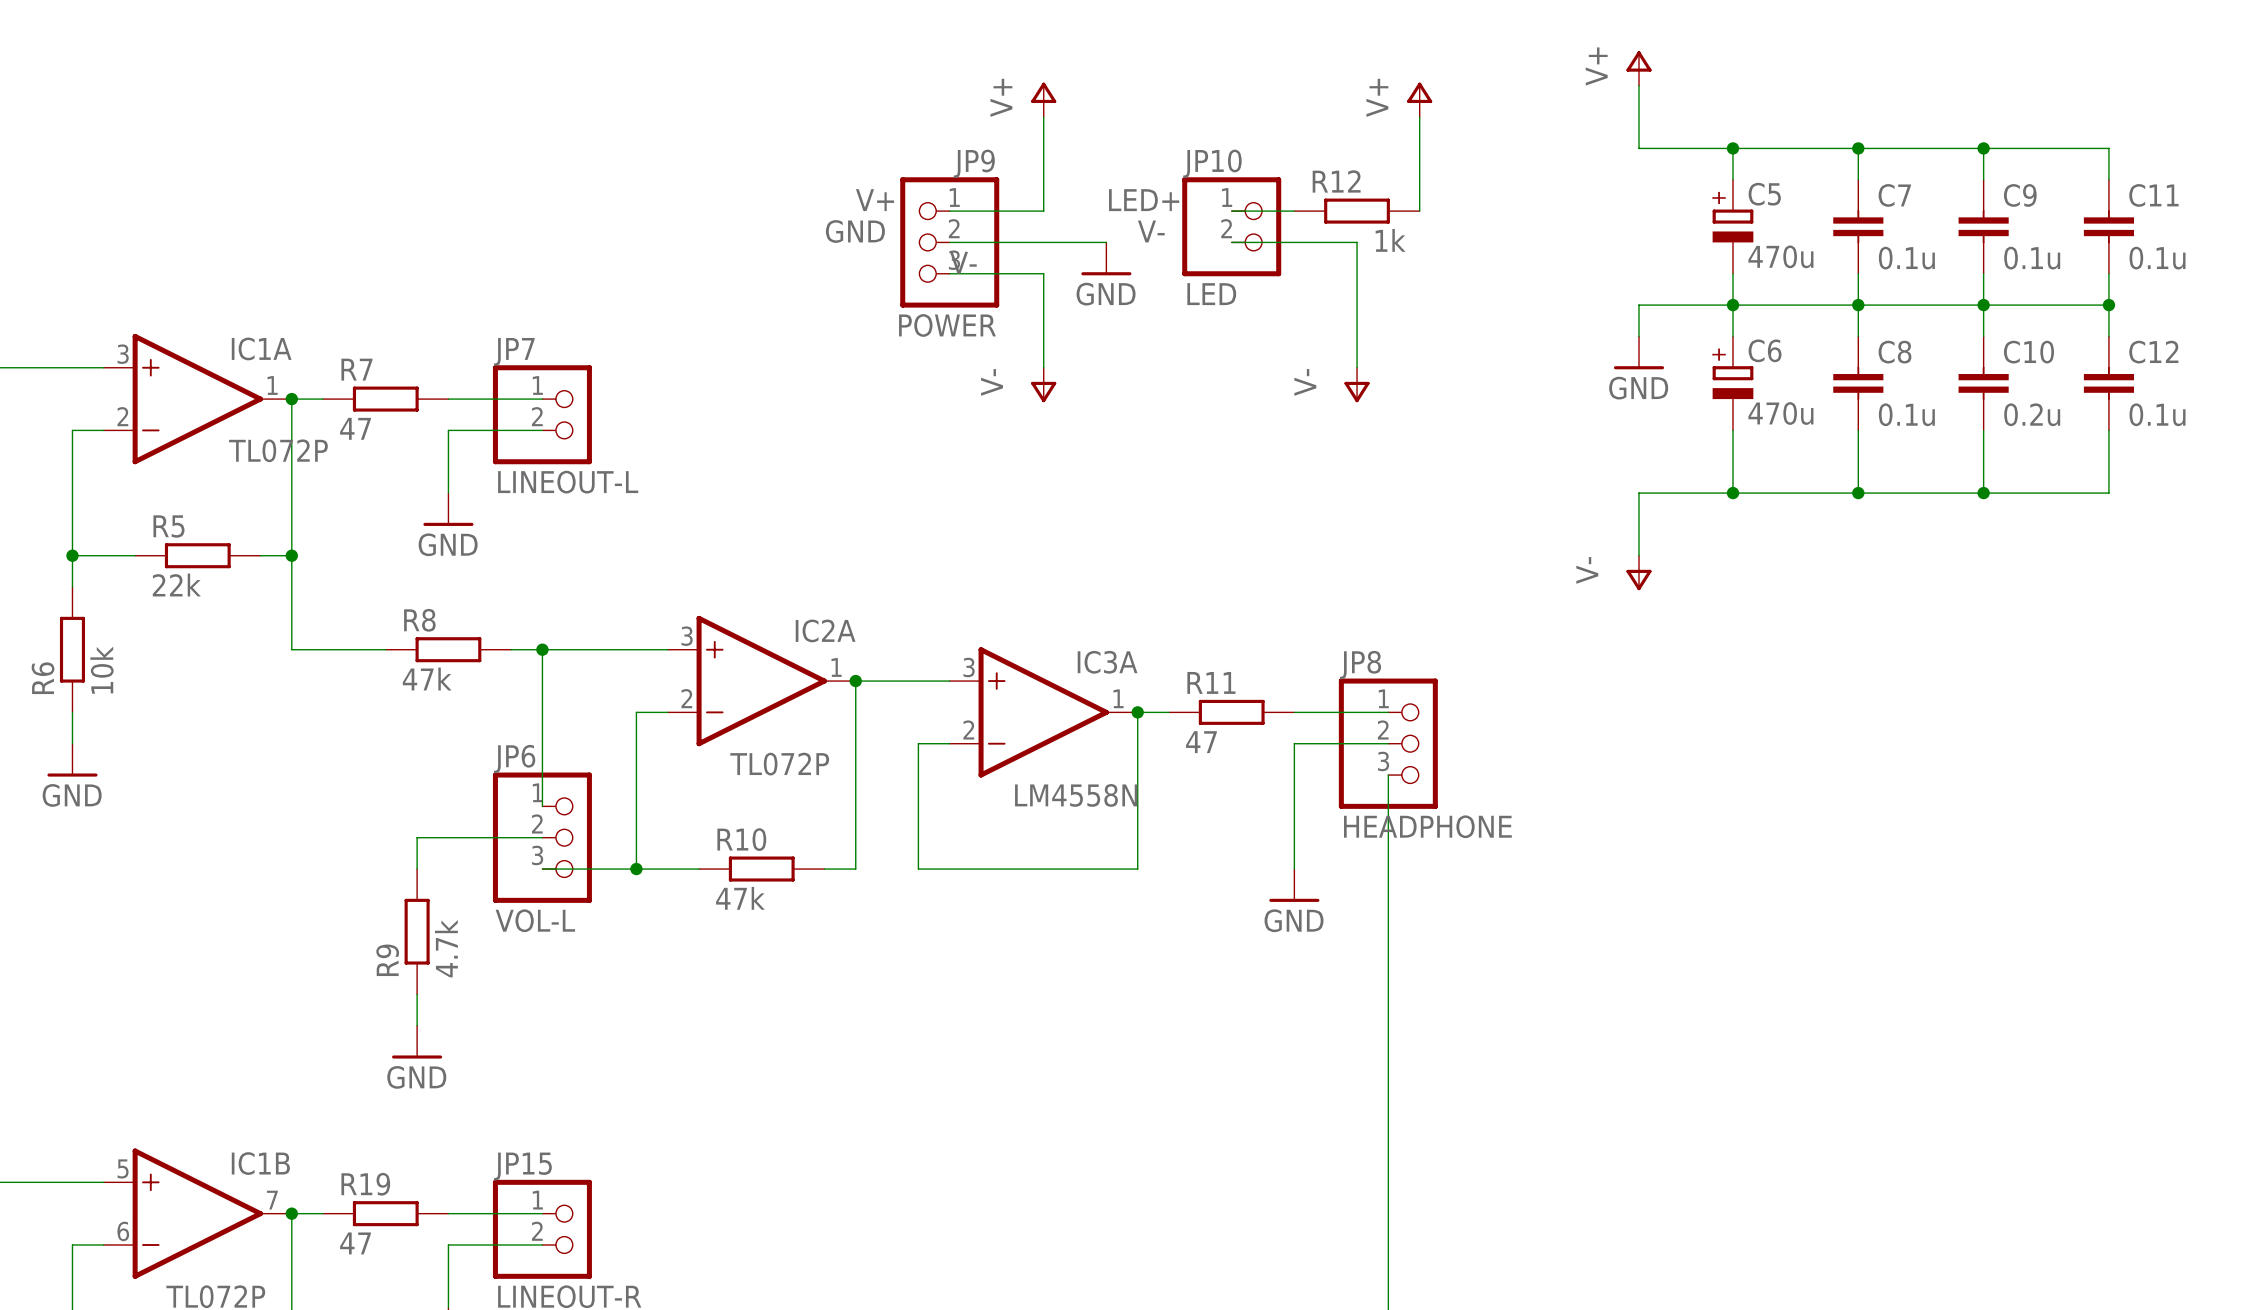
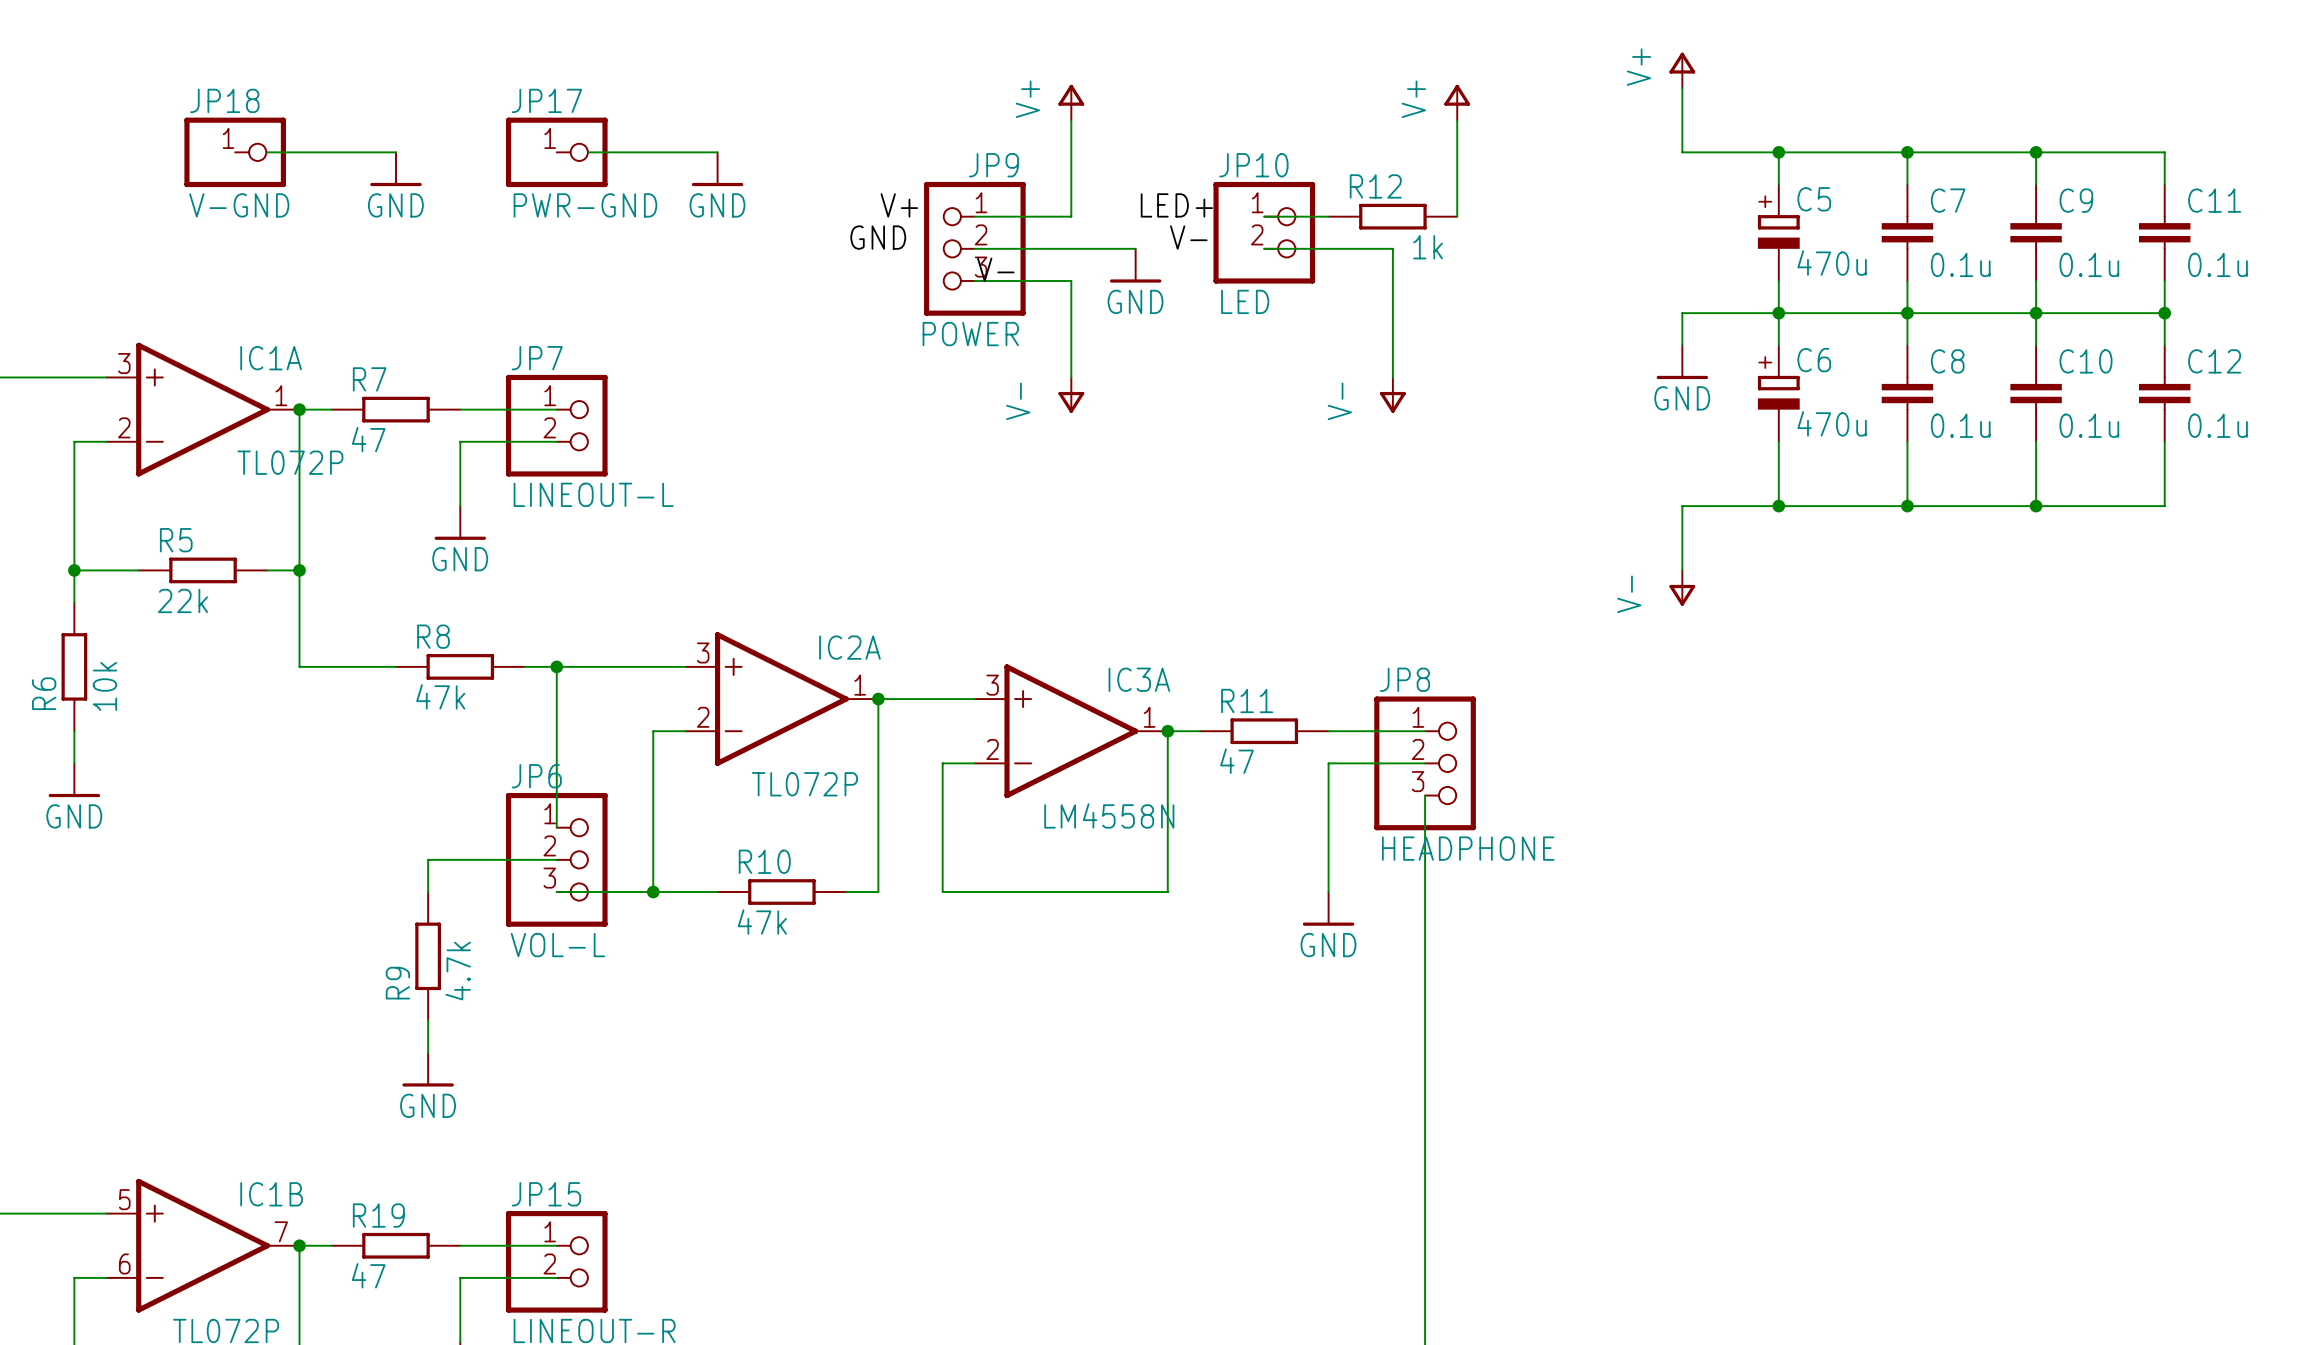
JP18: none -> V-GND (235, 152)
wire: none -> (267, 152) (395, 152)
JP17: none -> PWR-GND (556, 152)
wire: none -> (588, 152) (717, 152)
power symbol: none -> GND (395, 169)
power symbol: none -> GND (717, 169)
C10 value: 0.2u (2032, 414) -> 0.1u (2089, 425)

